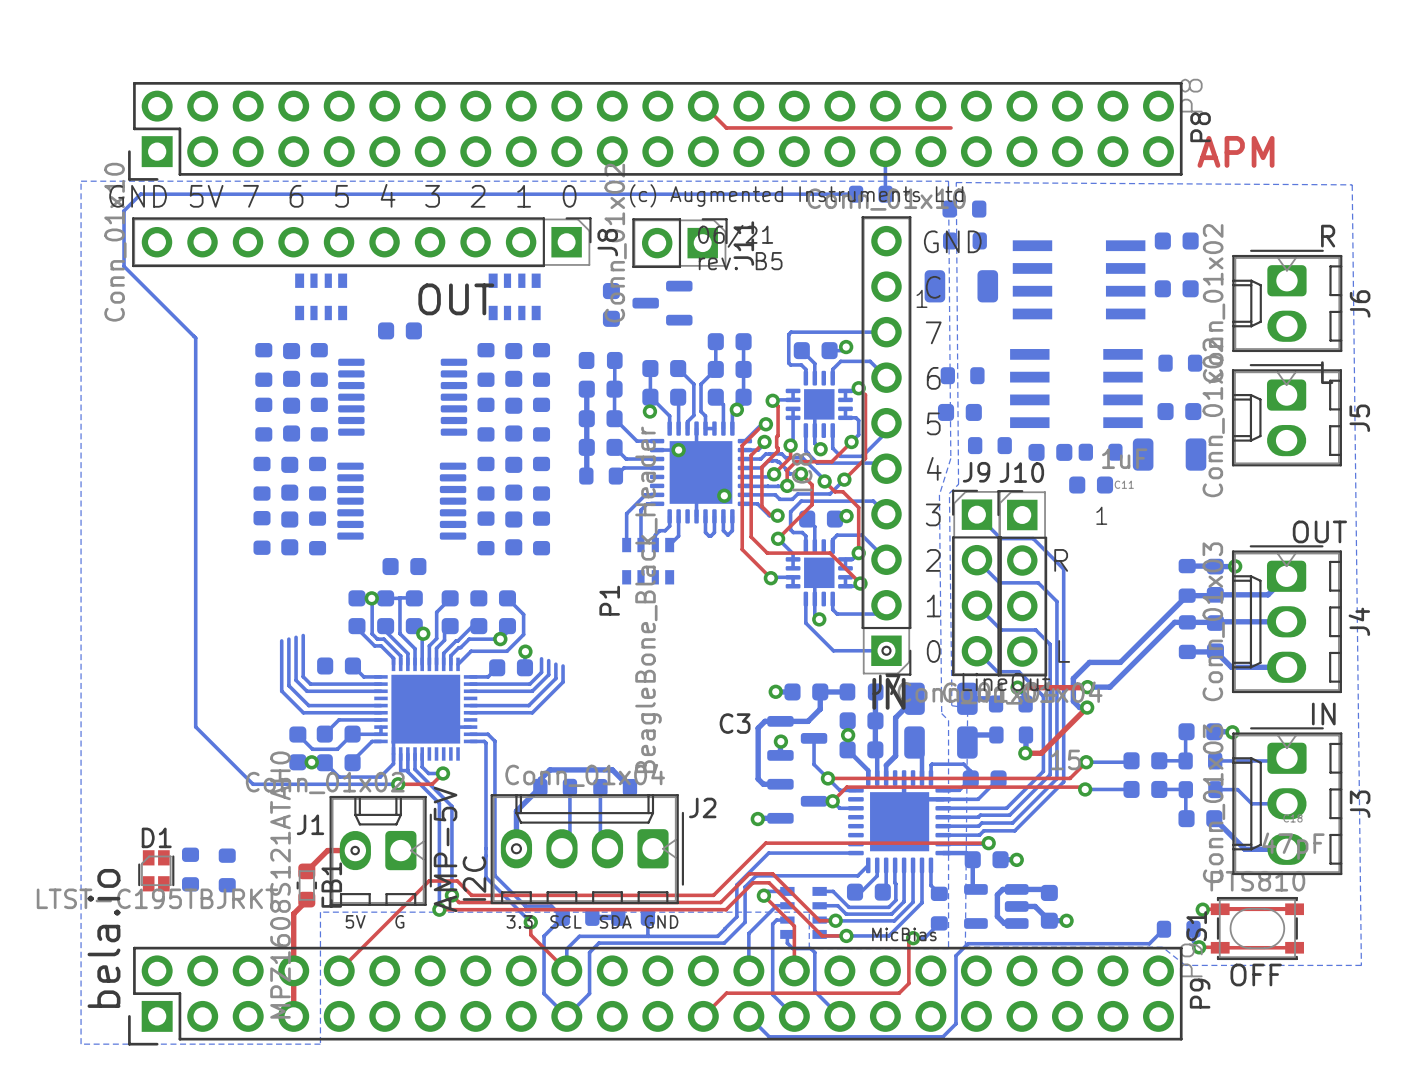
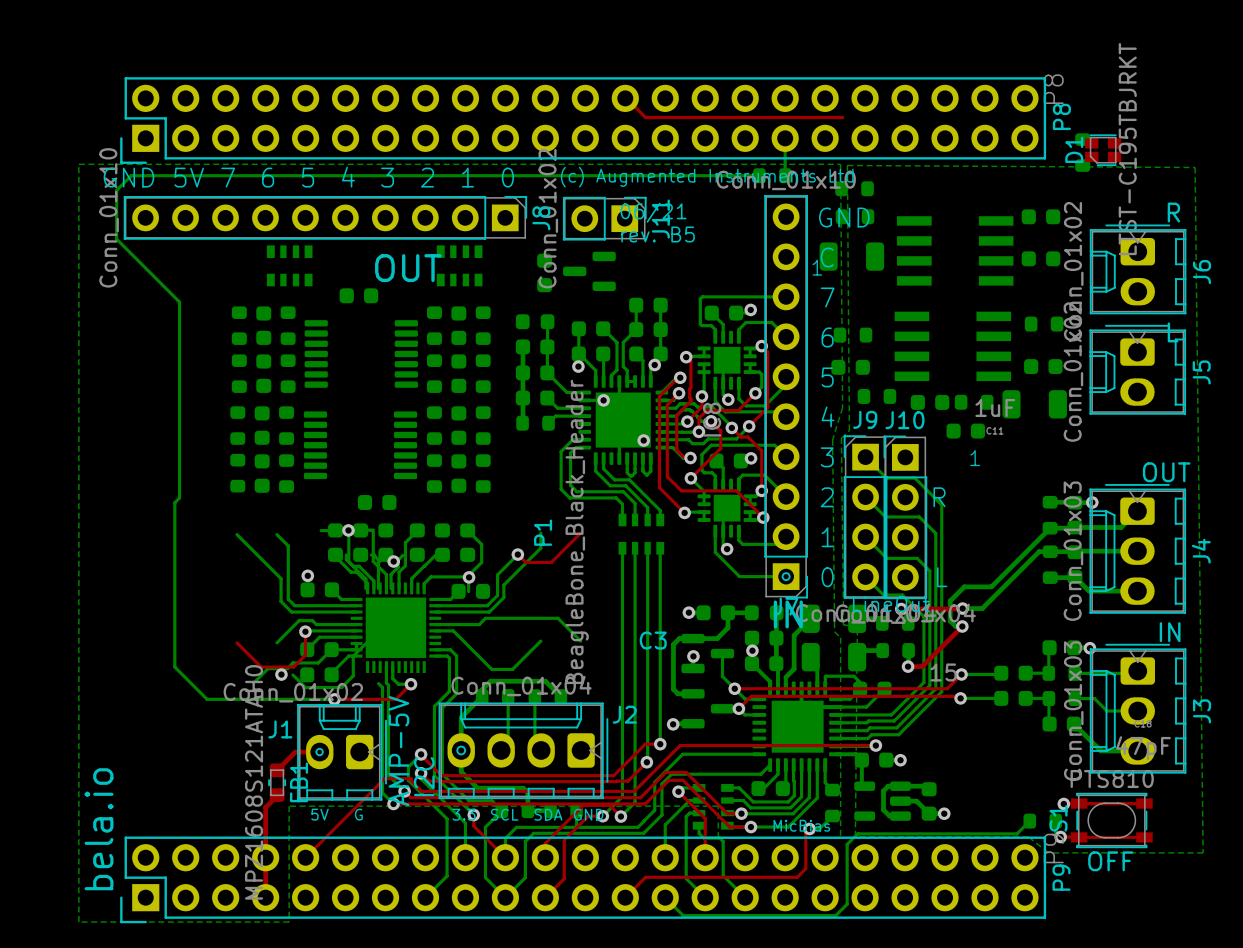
text: APM (1236, 151) -> none
part: none -> (1082, 152)
bottom track: (645, 494) (626, 513) (626, 545) -> (574, 439) (561, 451) (561, 489) (569, 497) (616, 497) (622, 504) (622, 519)
bottom track: (669, 526) (655, 535) (655, 545) -> (595, 467) (595, 471) (610, 485) (625, 485) (647, 507) (647, 519)
bottom track: (678, 528) (678, 536) (669, 545) -> (603, 468) (614, 479) (629, 479) (660, 510) (660, 519)
bottom track: none -> (570, 483) (576, 491) (623, 491) (635, 503) (635, 519)
bottom track: (195, 561) (195, 726) (253, 784) (398, 784) -> (179, 497) (174, 502) (174, 667) (207, 699) (334, 699)
part position: (648, 561) -> (641, 534)
part position: (404, 566) -> (377, 502)
bottom track: (399, 597) (399, 633) (415, 648) (415, 664) -> (373, 530) (373, 561) (386, 574) (386, 588)
bottom track: (369, 598) (372, 600) (372, 633) (377, 639) (383, 639) (400, 655) (400, 664) -> (346, 530) (348, 532) (348, 561) (353, 566) (359, 566) (373, 581) (373, 588)
via position: (371, 598) -> (348, 530)
bottom track: (450, 598) (436, 612) (436, 638) (429, 645) (429, 664) -> (417, 530) (405, 542) (405, 565) (399, 572) (399, 588)
bottom track: (507, 598) (523, 614) (523, 634) (507, 651) (471, 651) (458, 664) -> none
bottom track: none -> (467, 530) (481, 544) (481, 562) (467, 576) (431, 576) (424, 583) (424, 588)
bottom track: none -> (540, 533) (540, 548) (503, 585) (503, 597) (489, 612) (435, 612)
top track: none -> (580, 533) (551, 562) (525, 562) (517, 554)
bottom track: none -> (237, 534) (281, 578) (281, 601) (291, 612) (356, 612)
bottom track: none -> (276, 534) (288, 545) (288, 599) (294, 605) (356, 605)
part: (356, 612) -> none
part: none -> (335, 542)
part: (385, 612) -> none
part: none -> (360, 542)
part: (414, 612) -> none
part: none -> (385, 542)
part: (450, 612) -> none
part: none -> (417, 542)
part: (478, 612) -> none
part: none -> (442, 542)
part: (507, 612) -> none
part: none -> (467, 542)
bottom track: none -> (622, 548) (622, 796) (602, 816)
bottom track: none -> (635, 548) (635, 802) (620, 816)
bottom track: none -> (647, 548) (646, 762)
bottom track: none -> (660, 548) (660, 744)
bottom track: none -> (442, 554) (435, 554) (411, 578) (411, 588)
bottom track: none -> (517, 554) (497, 574) (497, 595) (487, 605) (435, 605)
via: none -> (517, 554)
bottom track: (356, 626) (374, 645) (381, 645) (393, 658) (393, 664) -> (335, 554) (351, 572) (356, 572) (367, 583) (367, 588)
bottom track: (478, 626) (472, 626) (443, 653) (443, 664) -> none
via position: (423, 633) -> (393, 561)
bottom track: (303, 635) (303, 676) (310, 684) (380, 684) -> none
bottom track: (296, 637) (296, 680) (306, 691) (380, 691) -> none
bottom track: (288, 639) (288, 685) (308, 705) (380, 705) -> none
bottom track: (500, 639) (507, 631) (507, 626) (494, 639) (469, 639) (450, 655) (450, 664) -> none
via: (500, 639) -> none
bottom track: (281, 640) (281, 691) (303, 712) (380, 712) -> none
via: none -> (307, 575)
bottom track: (541, 658) (541, 672) (529, 684) (470, 684) -> none
bottom track: (548, 660) (548, 674) (532, 691) (470, 691) -> none
bottom track: (555, 664) (555, 678) (528, 705) (470, 705) -> none
part position: (339, 665) -> (319, 589)
bottom track: (352, 665) (363, 676) (380, 676) -> (331, 589) (341, 599) (356, 599)
bottom track: (563, 665) (563, 682) (532, 712) (470, 712) -> none
bottom track: (497, 667) (488, 676) (470, 676) -> (458, 591) (450, 599) (435, 599)
part position: (511, 667) -> (470, 591)
bottom track: none -> (356, 624) (316, 624) (312, 620) (299, 620) (276, 642)
bottom track: none -> (435, 624) (479, 624) (485, 618) (557, 618) (580, 641)
part position: (425, 709) -> (395, 627)
bottom track: none -> (356, 630) (305, 631)
bottom track: none -> (435, 630) (453, 630) (491, 669) (512, 669) (540, 641)
top track: none -> (305, 631) (305, 655) (293, 667) (261, 667) (237, 642)
via: none -> (305, 631)
bottom track: (380, 719) (338, 719) (324, 734) -> (356, 637) (319, 637) (307, 649)
bottom track: (380, 727) (380, 734) (352, 734) -> (356, 643) (356, 649) (331, 649)
part: none -> (319, 649)
bottom track: (297, 734) (312, 749) (337, 749) (352, 734) (352, 740) -> none
part: (338, 734) -> none
bottom track: (470, 734) (487, 734) (494, 741) (494, 800) -> (435, 649) (450, 649) (456, 655) (456, 693) (442, 708)
bottom track: none -> (331, 655) (331, 649) (318, 662) (293, 662) (287, 668) (268, 668) (255, 681)
bottom track: (380, 741) (372, 741) (352, 760) -> (356, 656) (348, 656) (331, 673)
bottom track: (470, 741) (485, 743) (485, 798) -> (435, 656) (447, 656) (449, 658) (449, 691) (434, 706)
part: (297, 748) -> none
bottom track: (400, 753) (400, 770) (407, 770) -> none
bottom track: (407, 753) (407, 771) (439, 803) (439, 909) -> (378, 683) (382, 687) (382, 792) (393, 803)
bottom track: (415, 753) (415, 769) (451, 806) (451, 895) -> none
bottom track: (422, 753) (422, 767) (428, 773) (442, 773) -> (392, 667) (392, 678) (398, 684) (411, 684)
bottom track: none -> (386, 667) (386, 683) (388, 685) (388, 775) (403, 790)
part: (338, 762) -> none
part: none -> (319, 674)
top track: (442, 773) (432, 784) (398, 784) -> none
via position: (442, 773) -> (411, 684)
top track: none -> (411, 684) (395, 699) (334, 699)
via position: (398, 784) -> (334, 699)
top track: none -> (660, 744) (645, 744) (613, 775) (441, 775) (421, 754)
via: none -> (660, 744)
bottom track: none -> (461, 750) (461, 771) (477, 788) (523, 788) (527, 792) (527, 810)
bottom track: none -> (421, 754) (408, 767) (408, 780) (447, 818) (447, 876) (425, 897)
via: none -> (421, 754)
top track: none -> (646, 762) (627, 781) (439, 781) (428, 781) (421, 773)
via: none -> (646, 762)
part: (190, 869) -> none
D1 rotation: 0° (156, 870) -> 90° counterclockwise (1103, 150)
D1 position: (156, 870) -> (1103, 150)
part: (227, 870) -> none
bottom track: none -> (421, 773) (421, 778) (465, 823) (465, 857)
via: none -> (421, 773)
top track: none -> (602, 816) (588, 816) (564, 840) (564, 878) (545, 897)
via: none -> (602, 816)
top track: none -> (620, 816) (609, 805) (583, 805) (545, 843) (545, 857)
via: none -> (620, 816)

